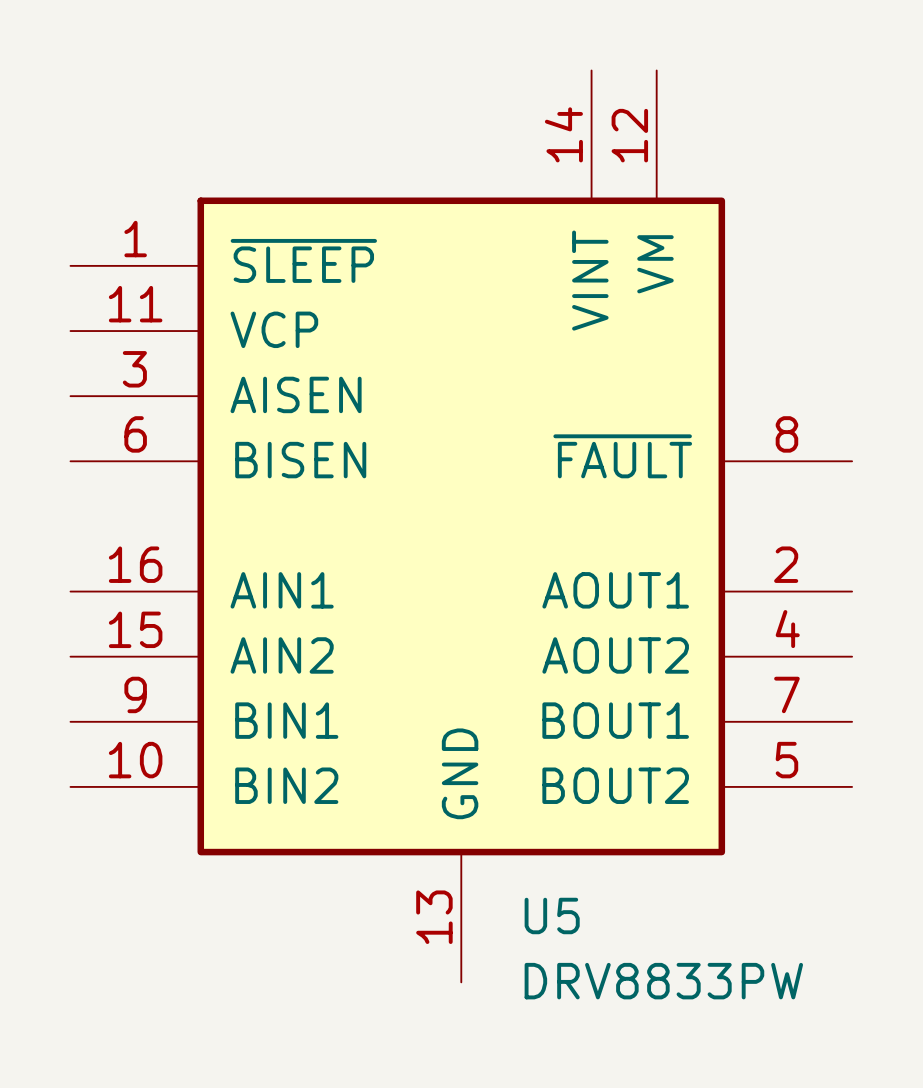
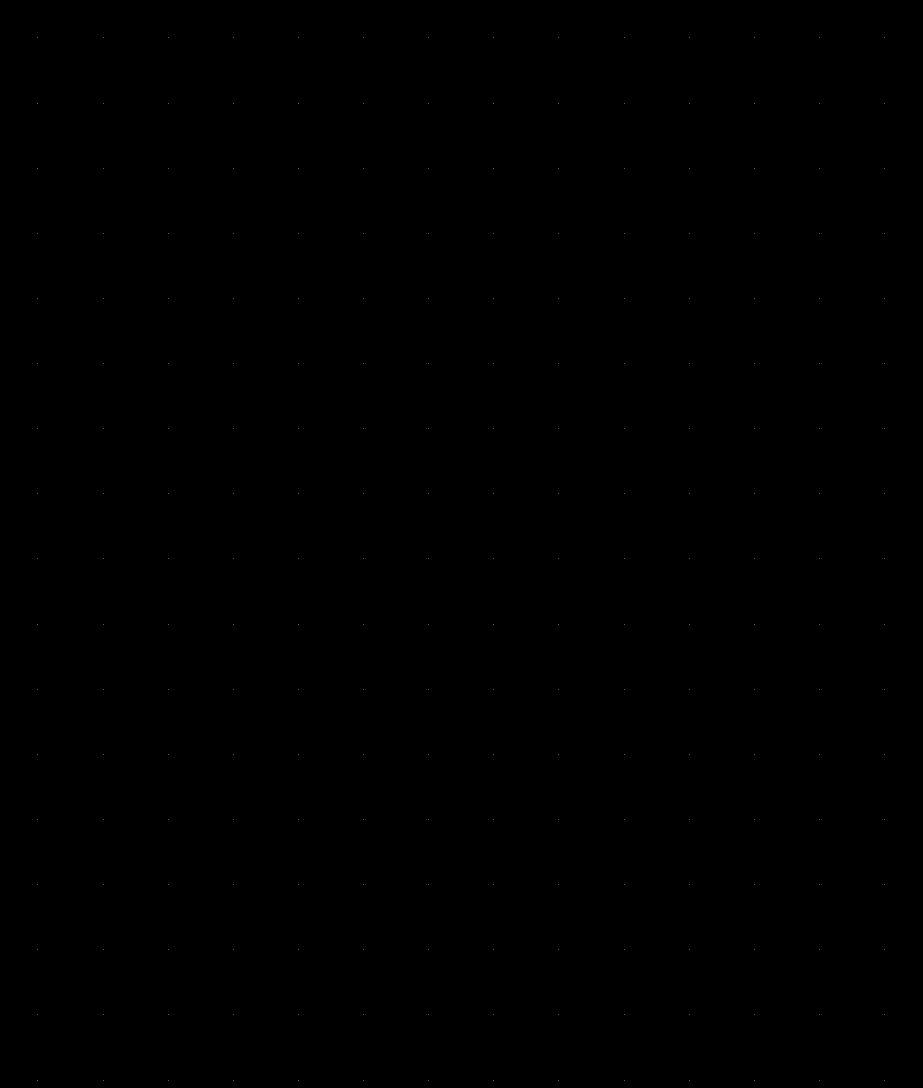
U5: DRV8833PW (461, 526) -> none

